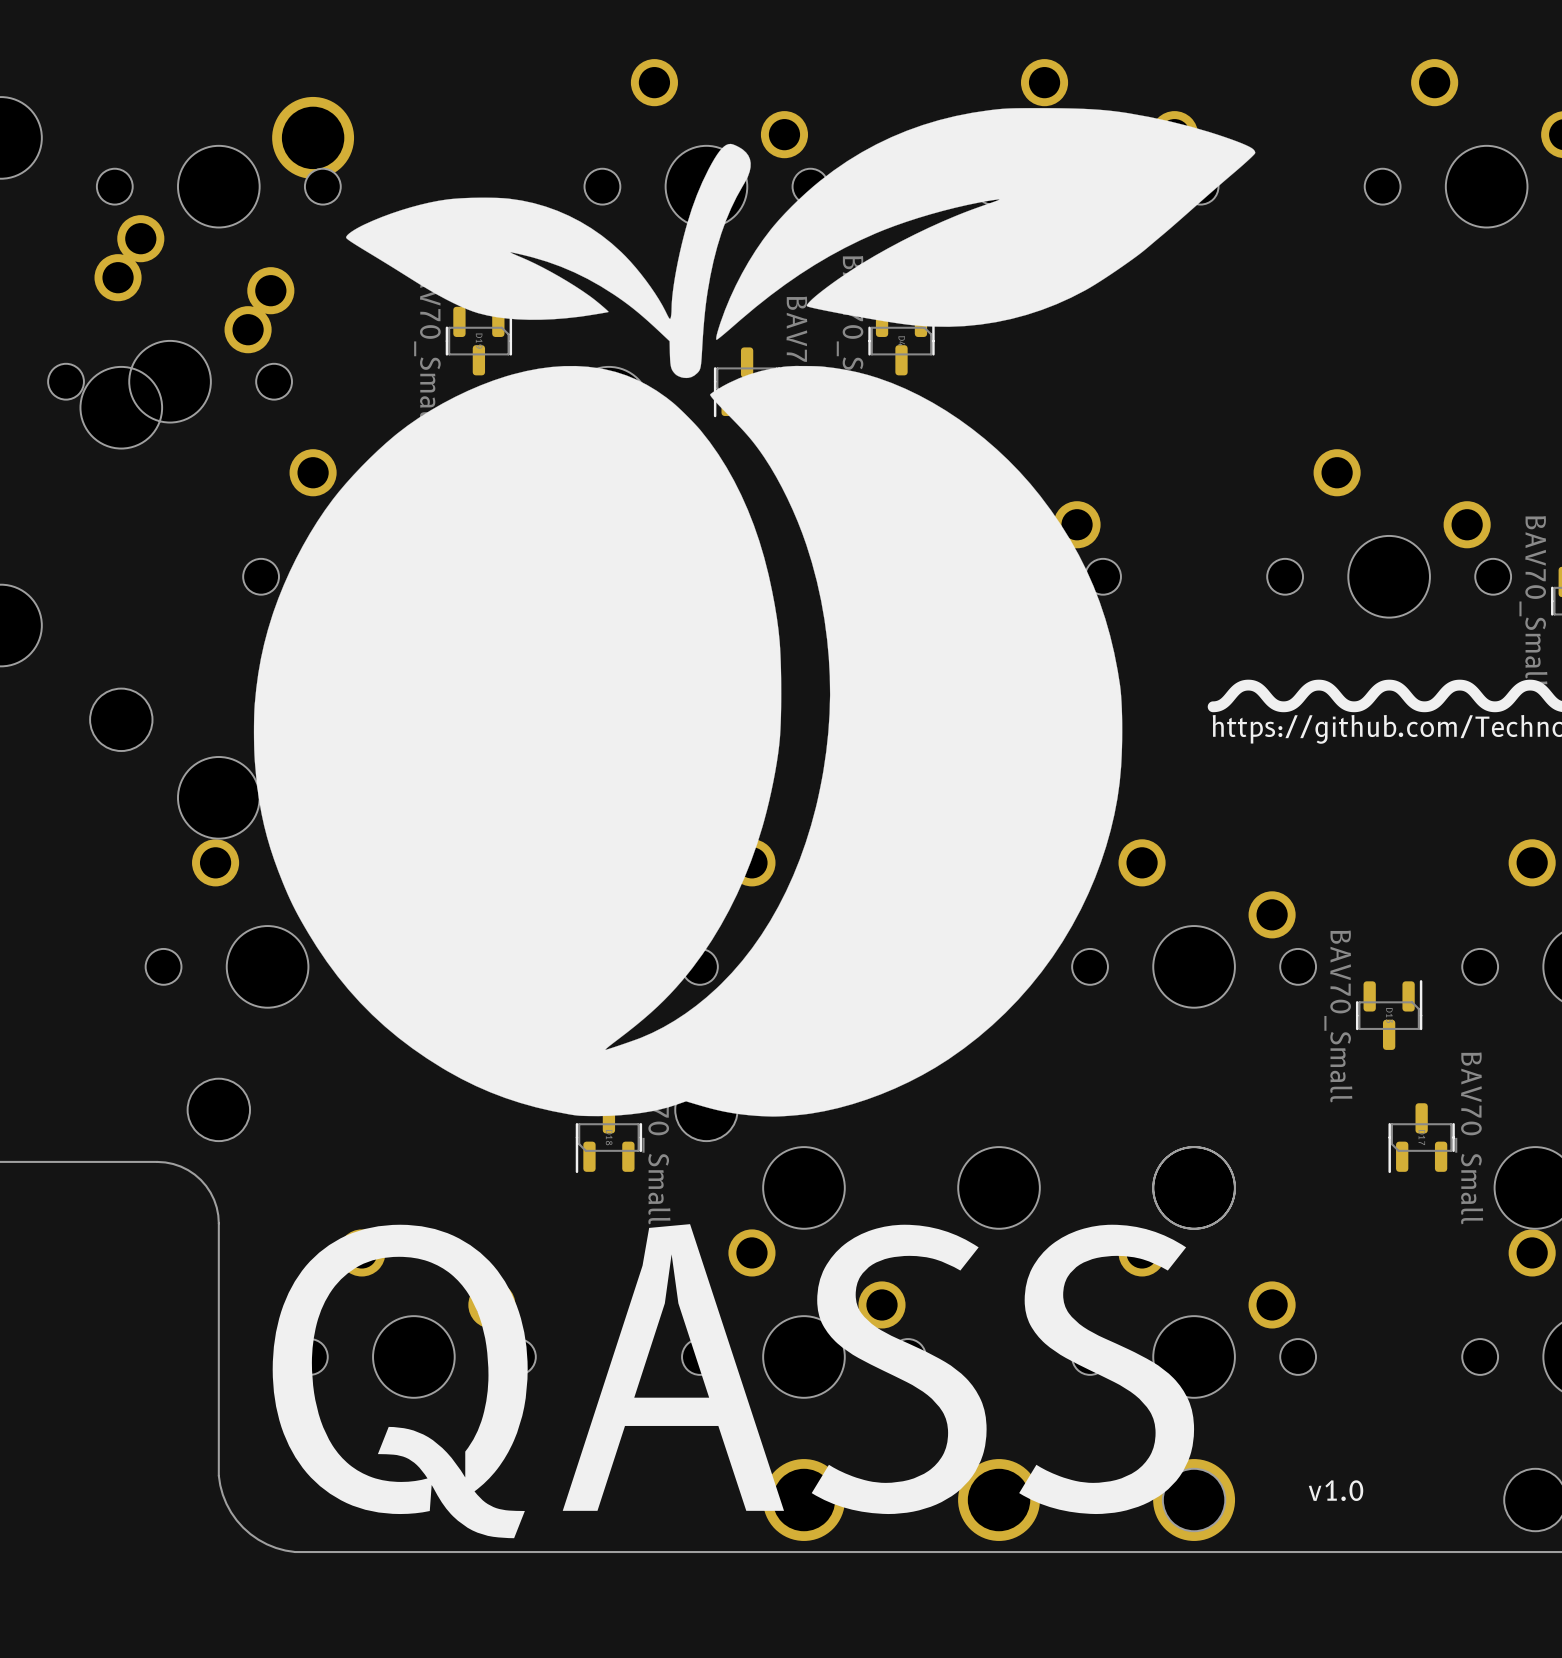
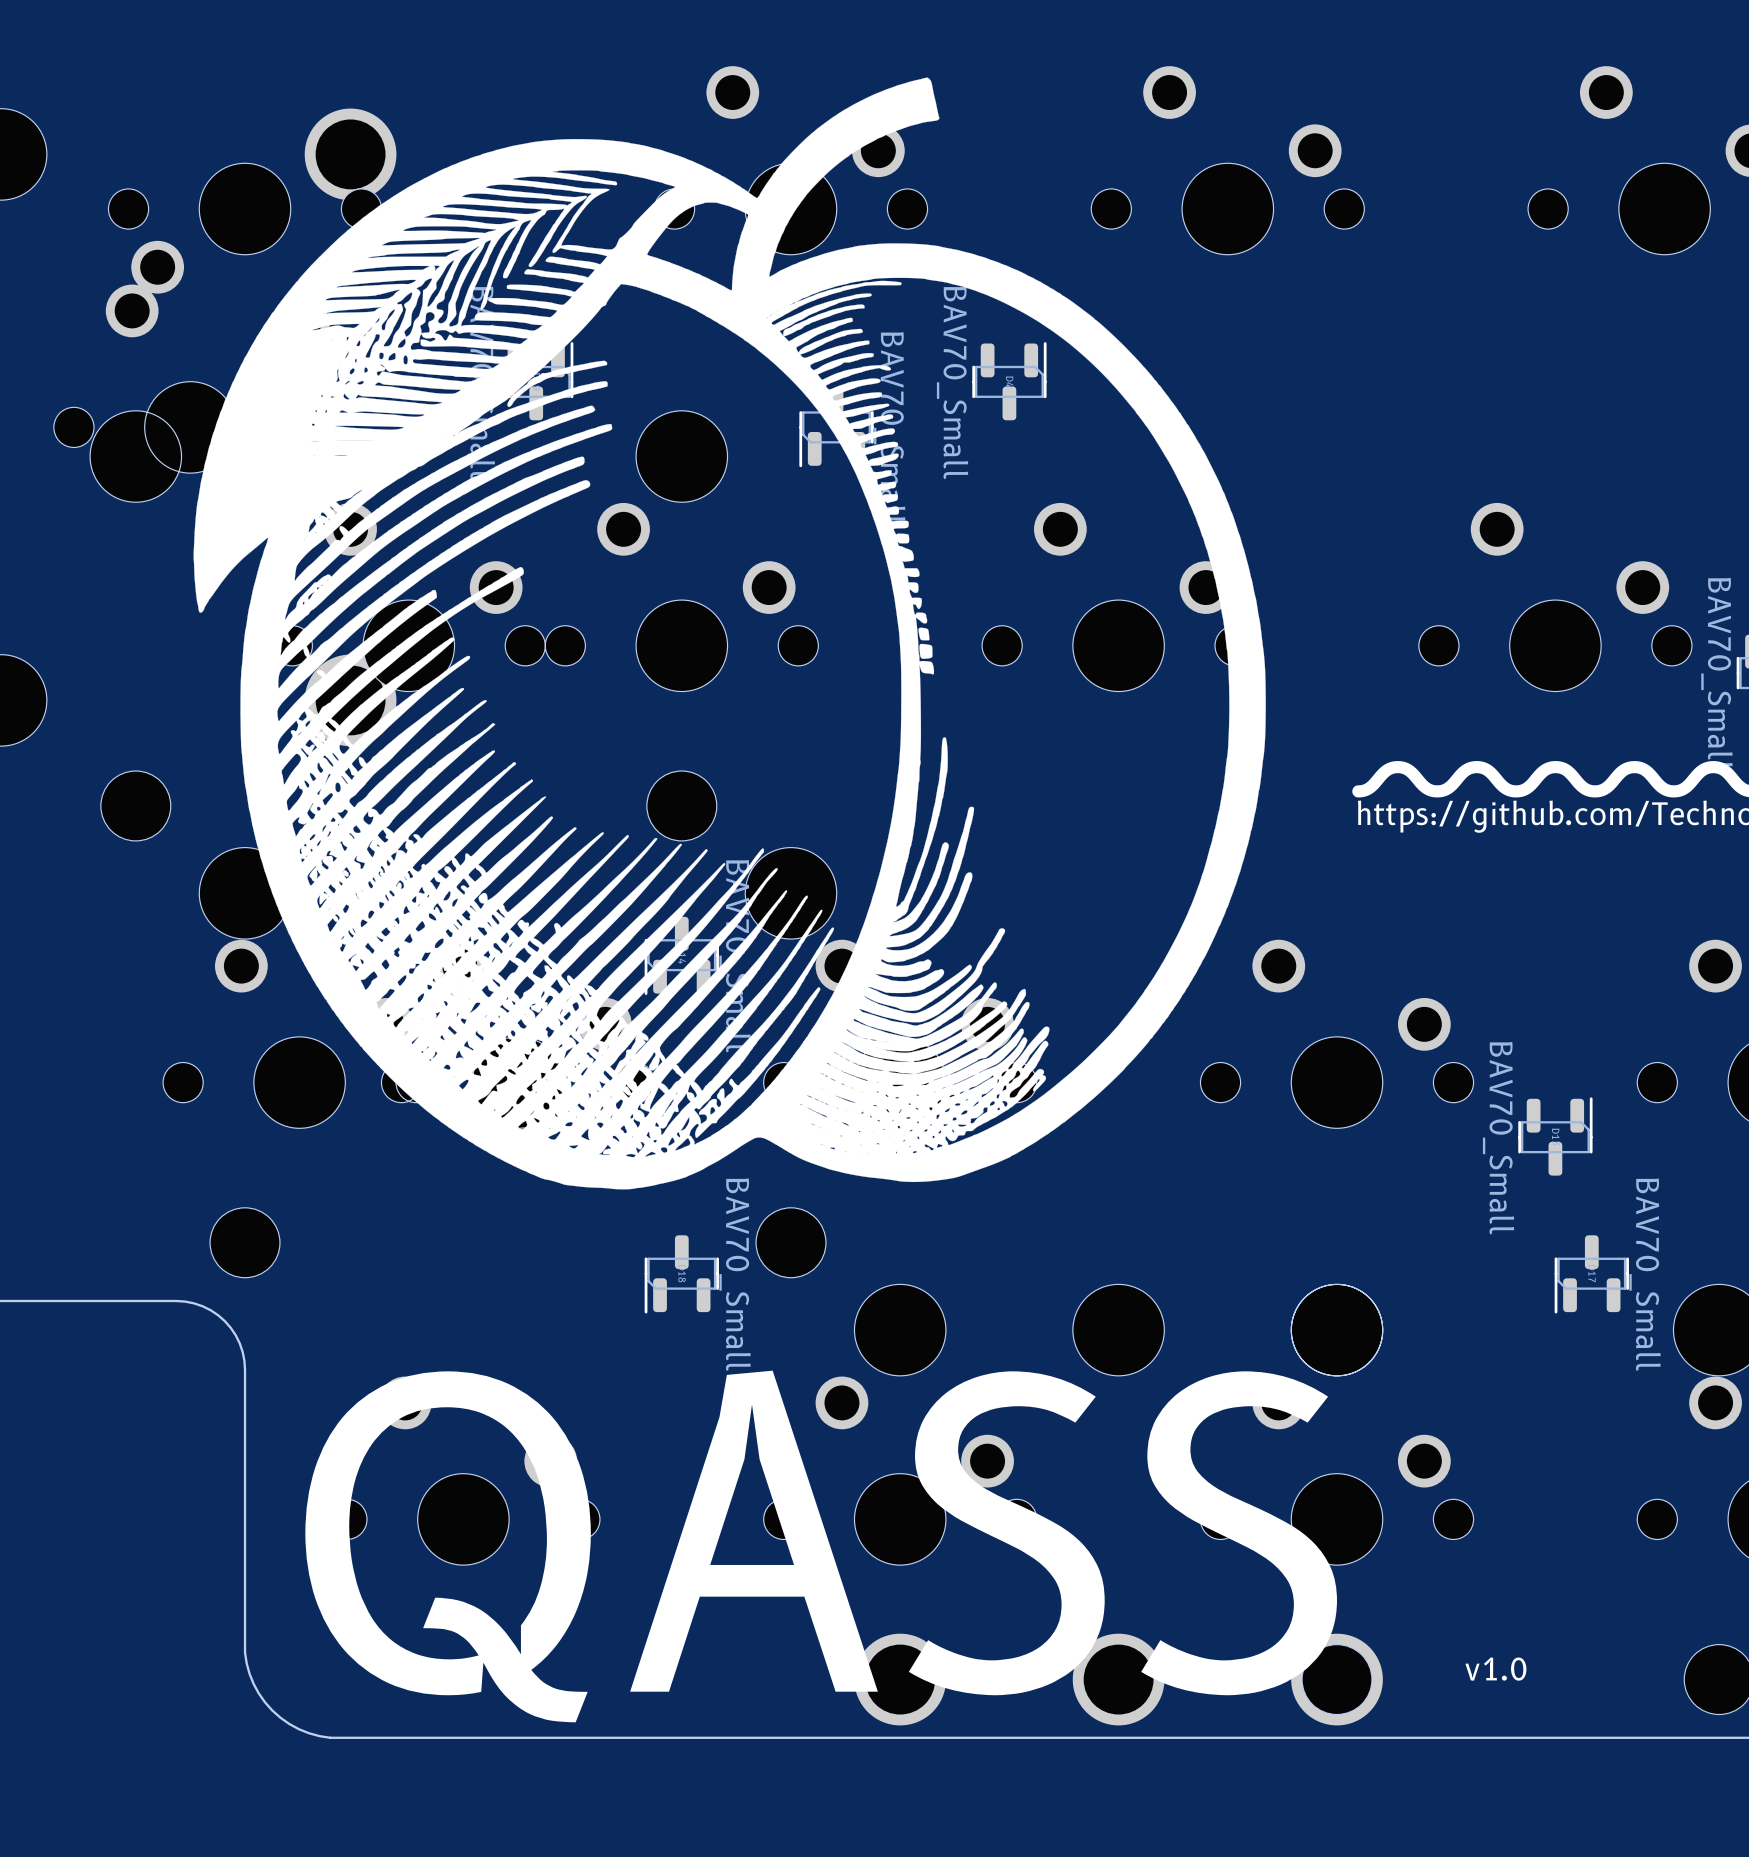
drawing: none -> [193, 77, 1266, 1190]
drawing: [253, 108, 1256, 1117] -> none

